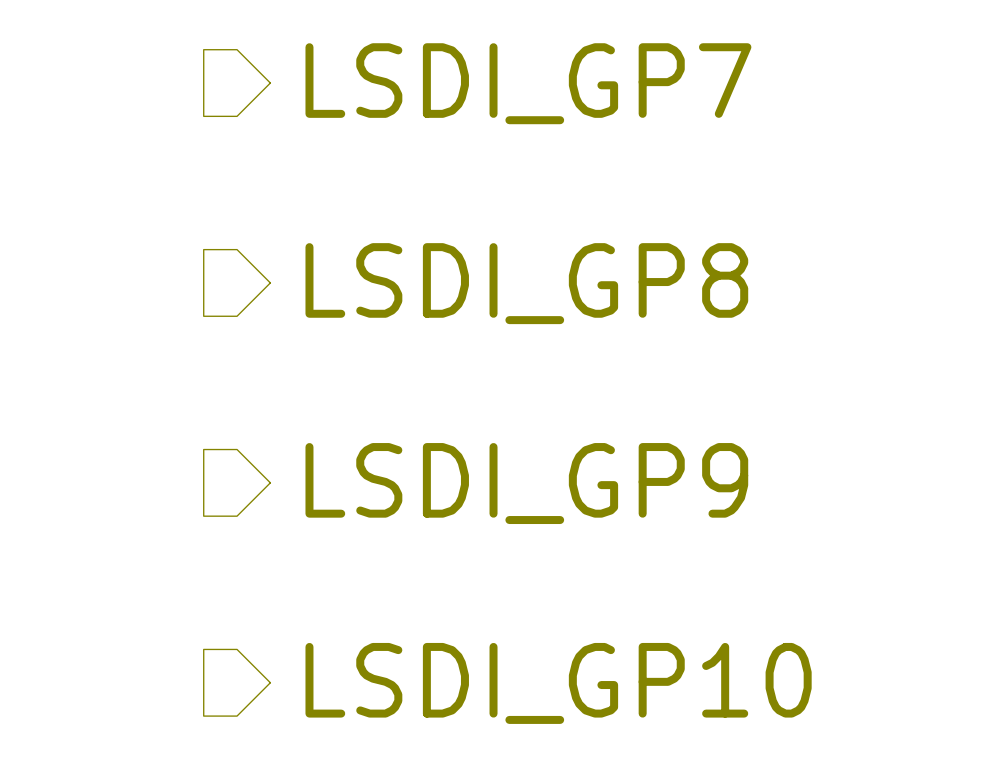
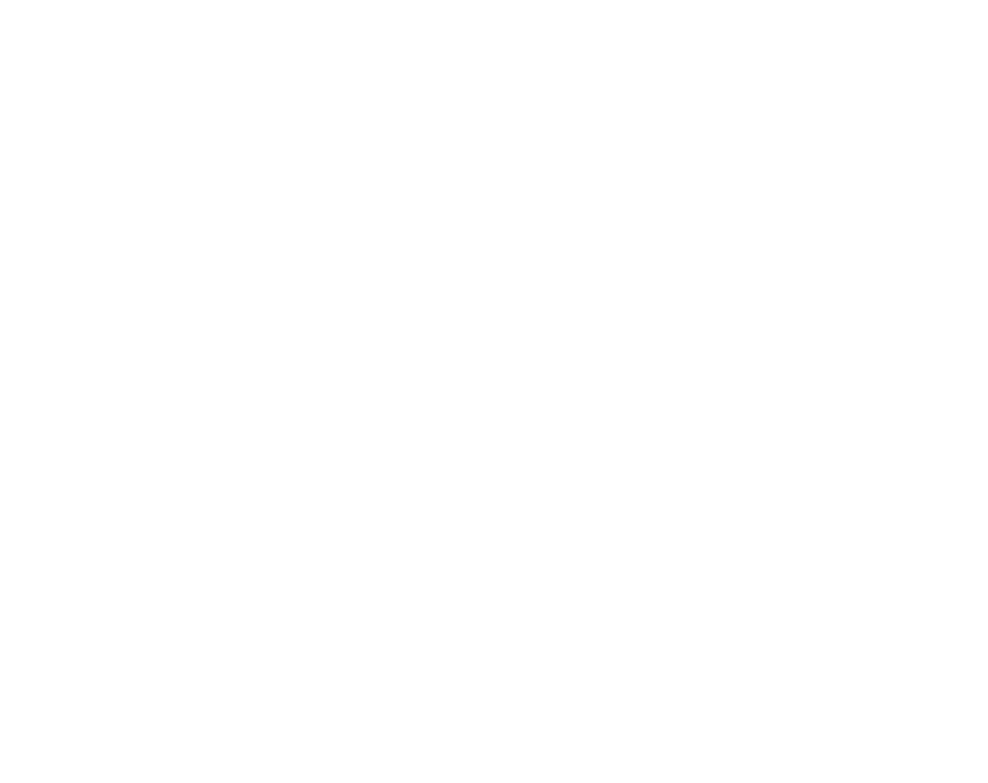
hierarchical label: LSDI_GP7 (528, 83) -> none
hierarchical label: LSDI_GP8 (526, 283) -> none
hierarchical label: LSDI_GP9 (526, 483) -> none
hierarchical label: LSDI_GP10 (558, 683) -> none

